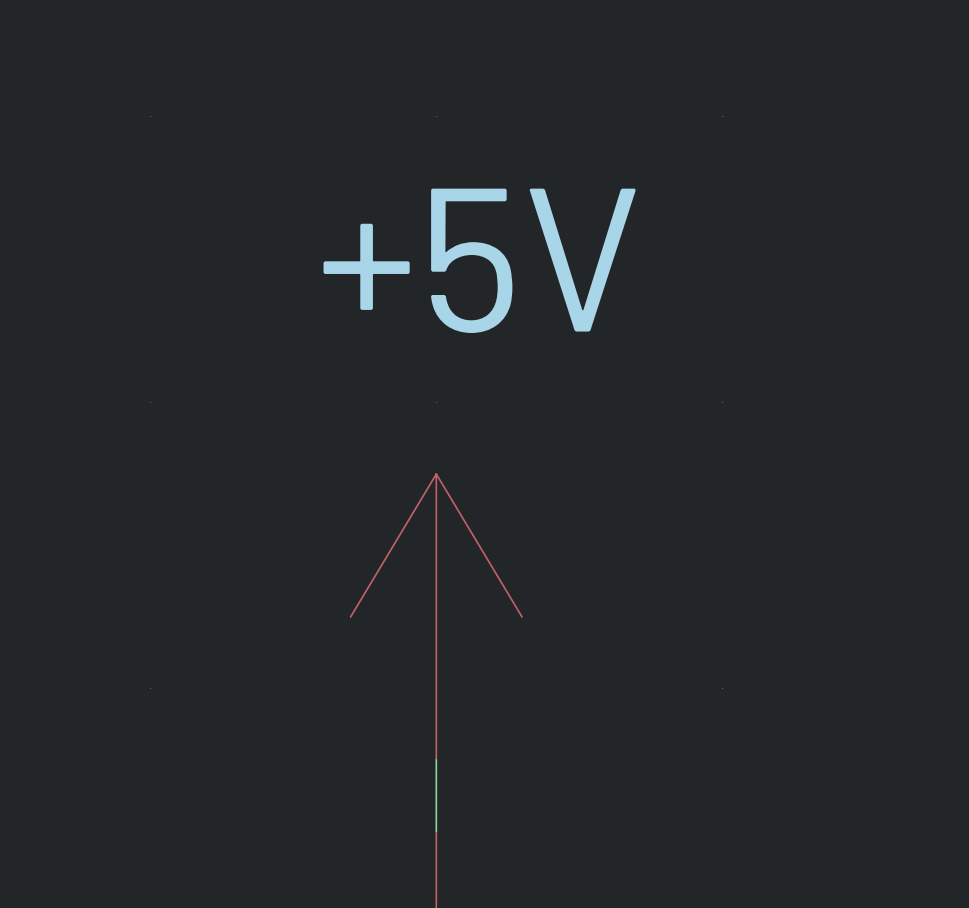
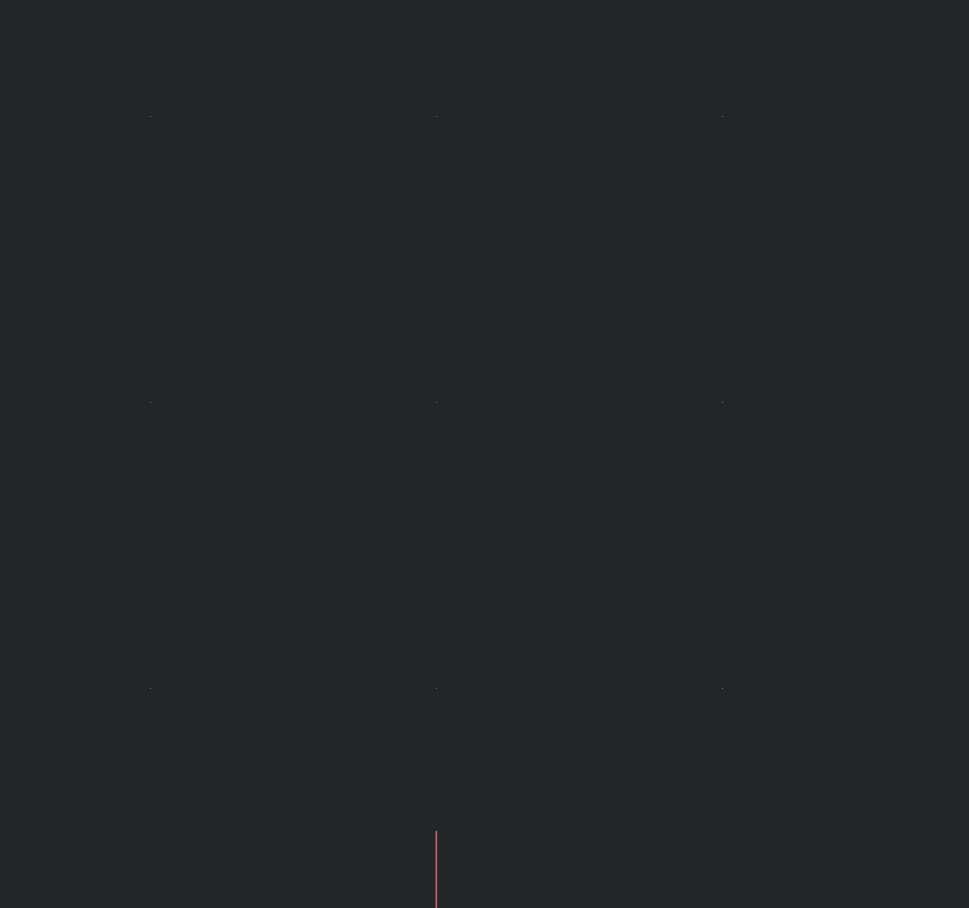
power symbol: +5V (436, 617) -> none
wire: (436, 759) (436, 831) -> none

